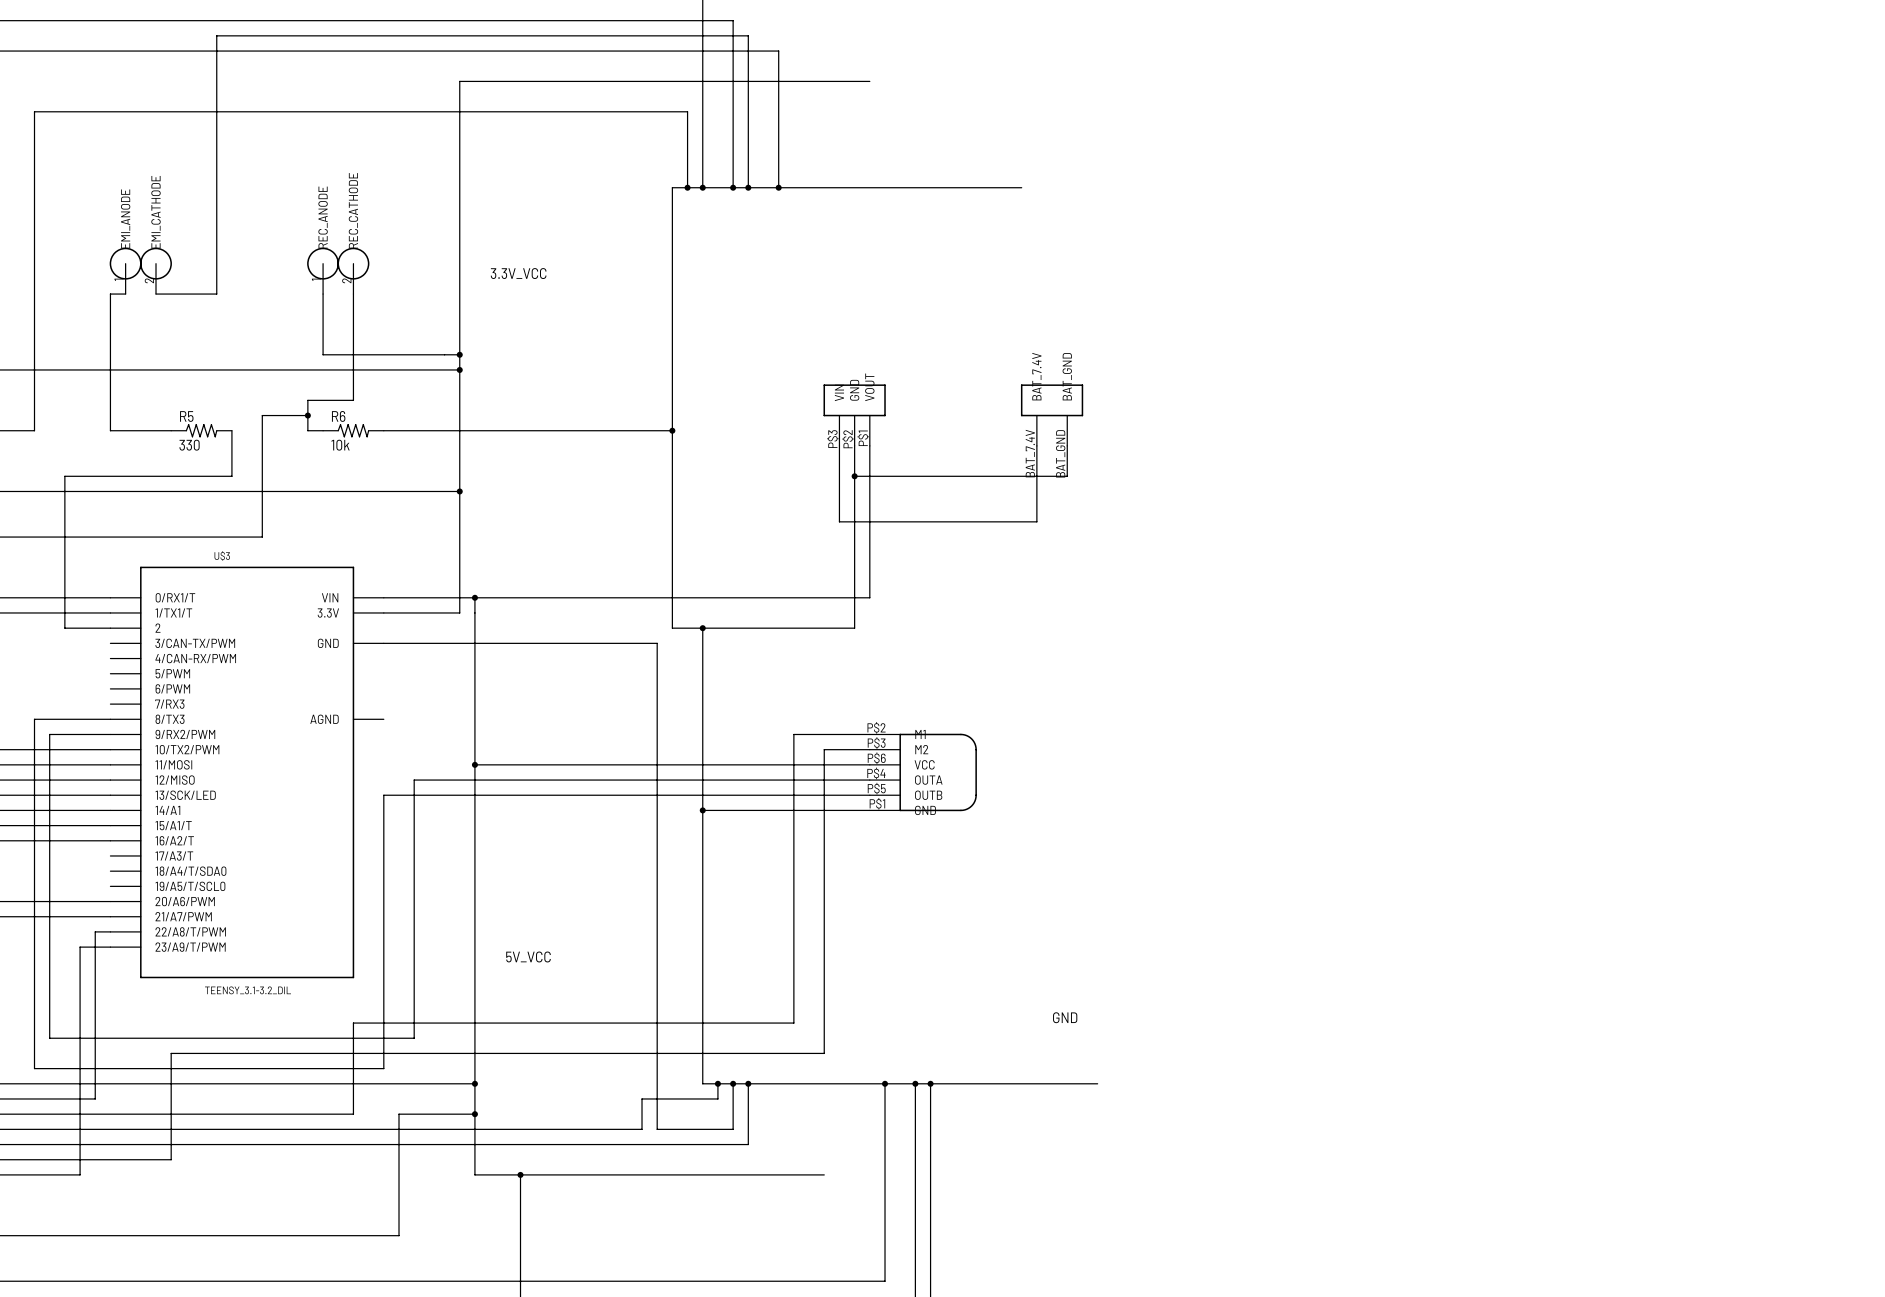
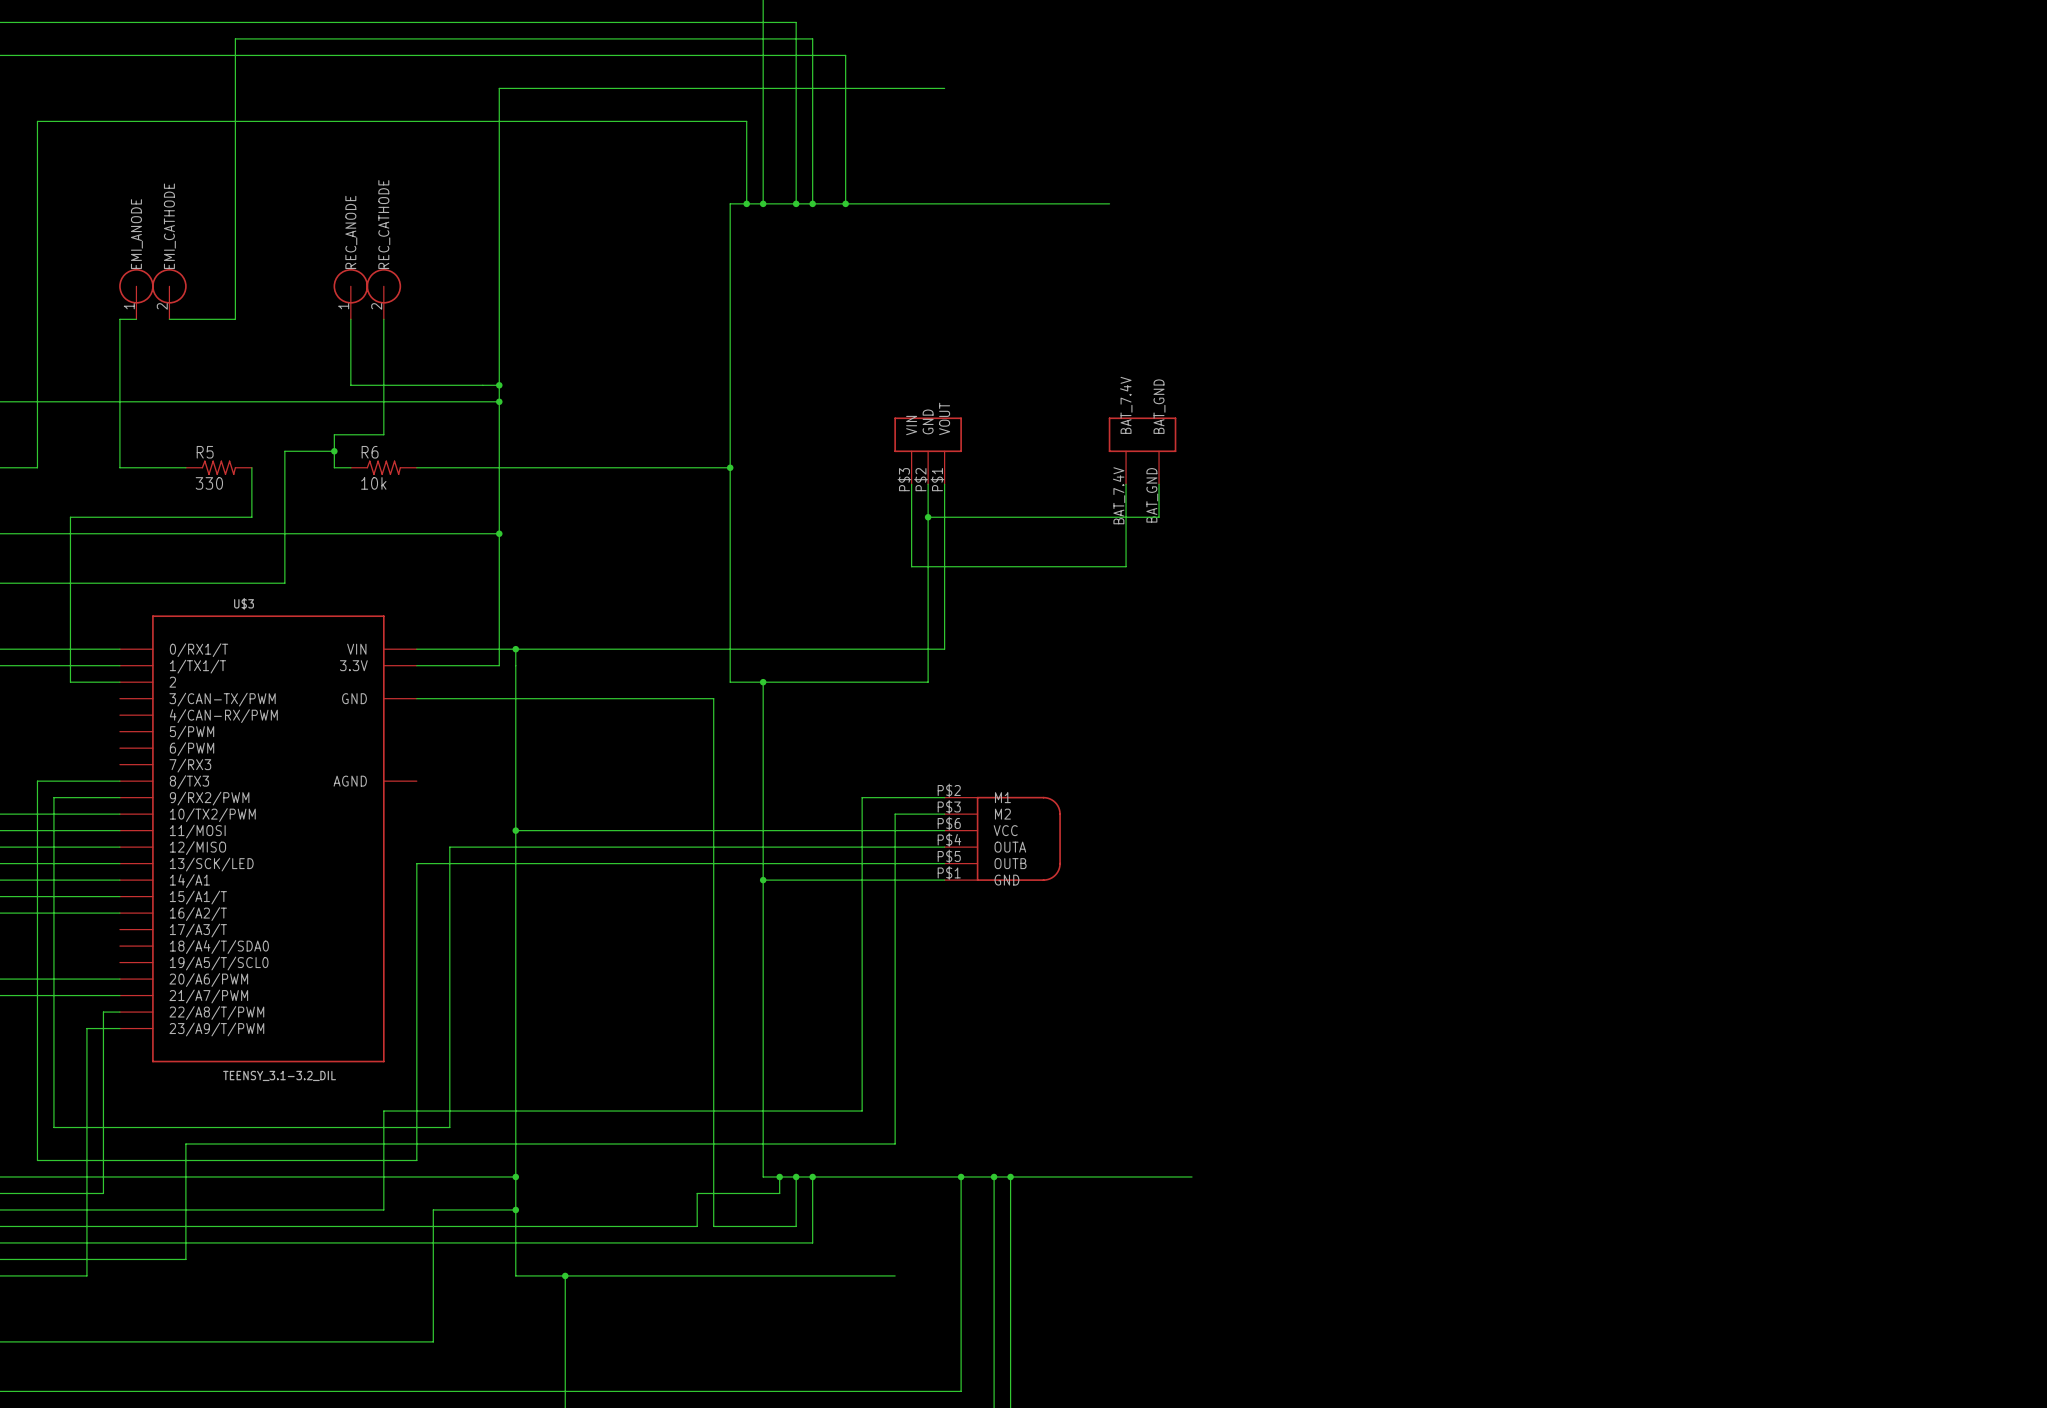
label: 3.3V_VCC (518, 273) -> none
label: 5V_VCC (528, 956) -> none
label: GND (1065, 1017) -> none

